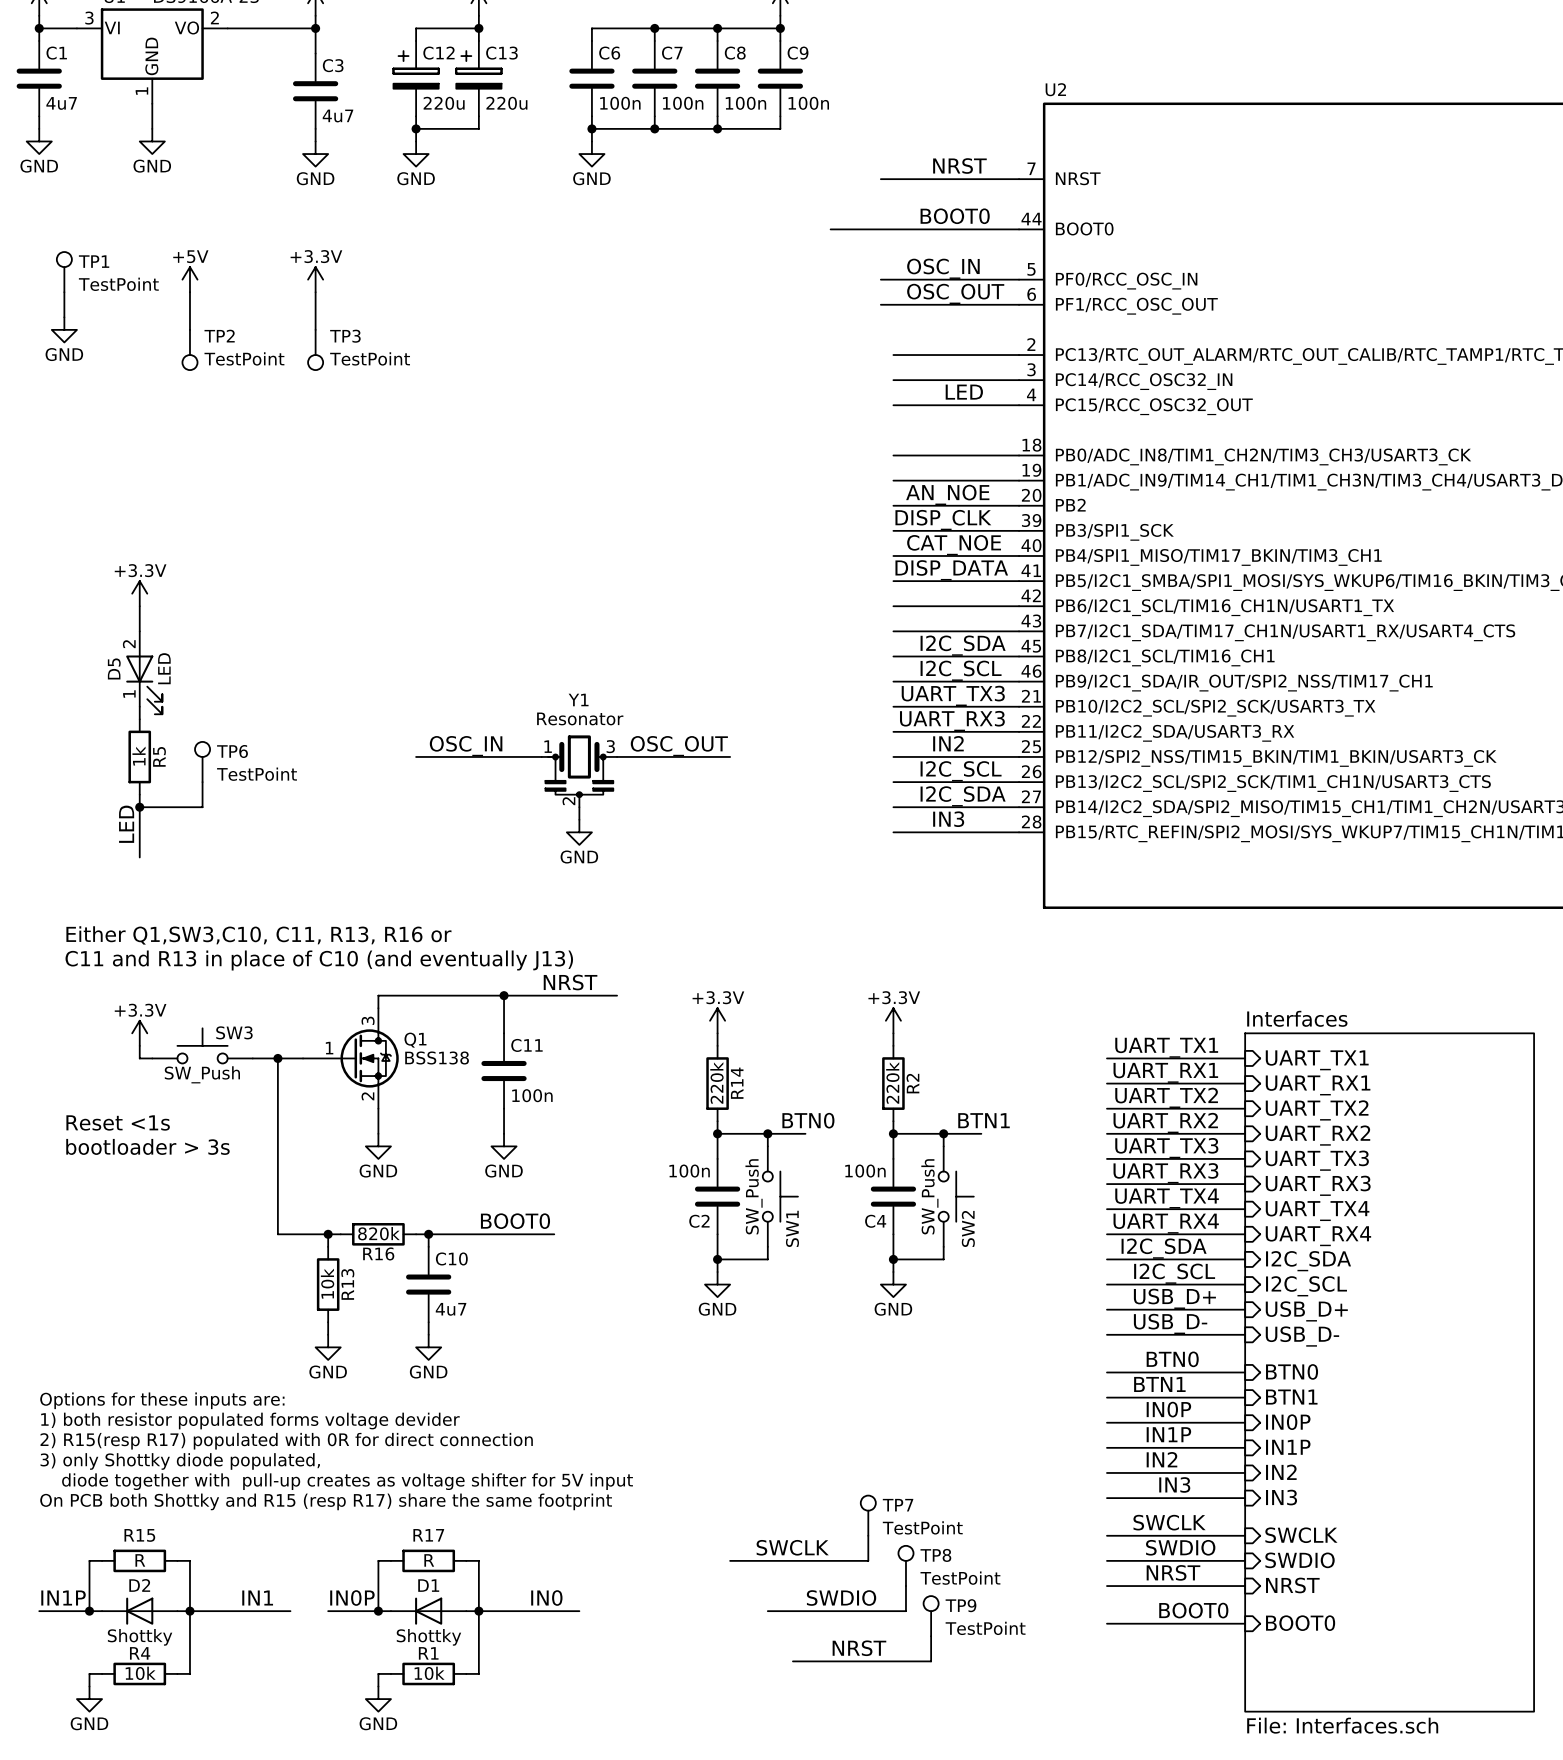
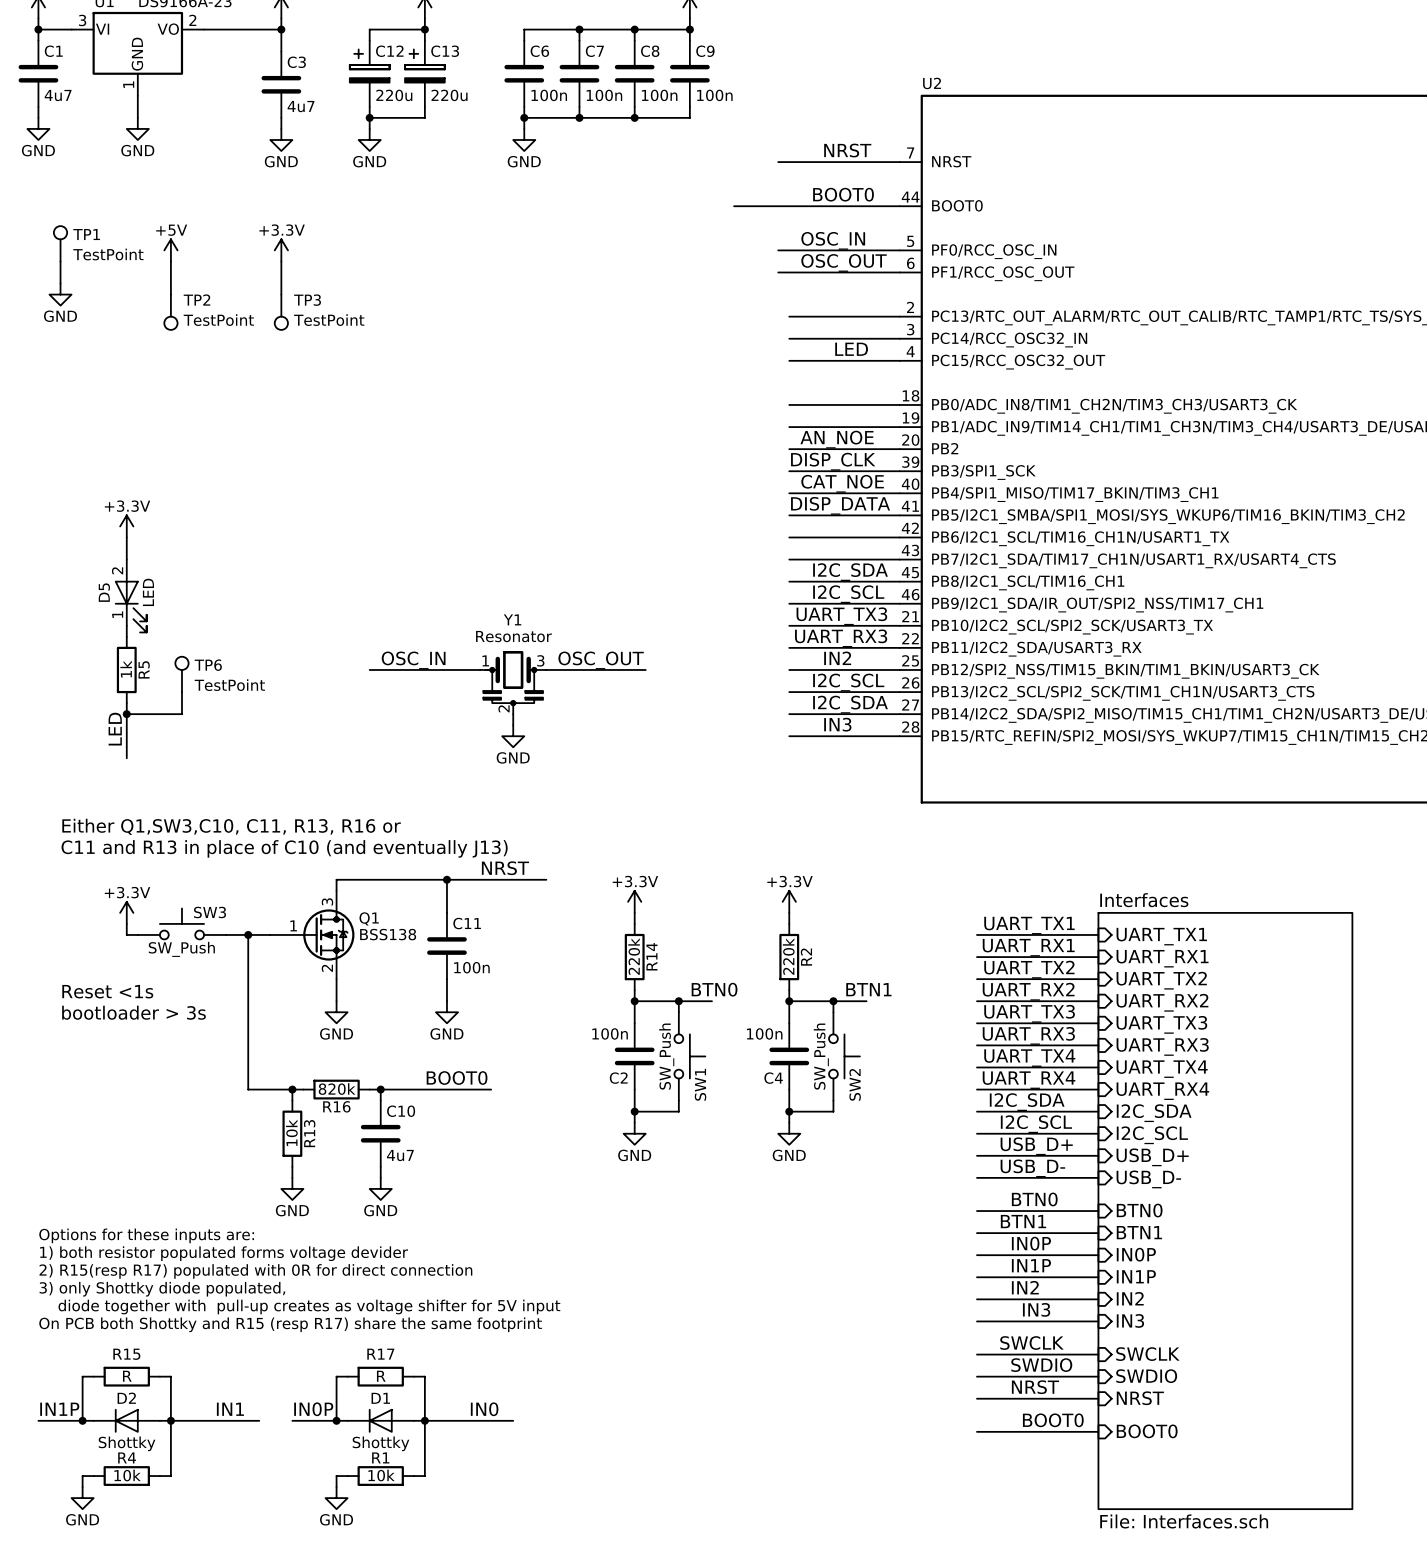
TP7: TestPoint (868, 1515) -> none
wire: (868, 1535) (868, 1560) (730, 1560) -> none
label: SWCLK (792, 1547) -> none
TP8: TestPoint (905, 1565) -> none
wire: (905, 1586) (905, 1611) (767, 1611) -> none
label: SWDIO (841, 1598) -> none
TP9: TestPoint (931, 1616) -> none
wire: (931, 1636) (931, 1661) (792, 1661) -> none
label: NRST (859, 1648) -> none

